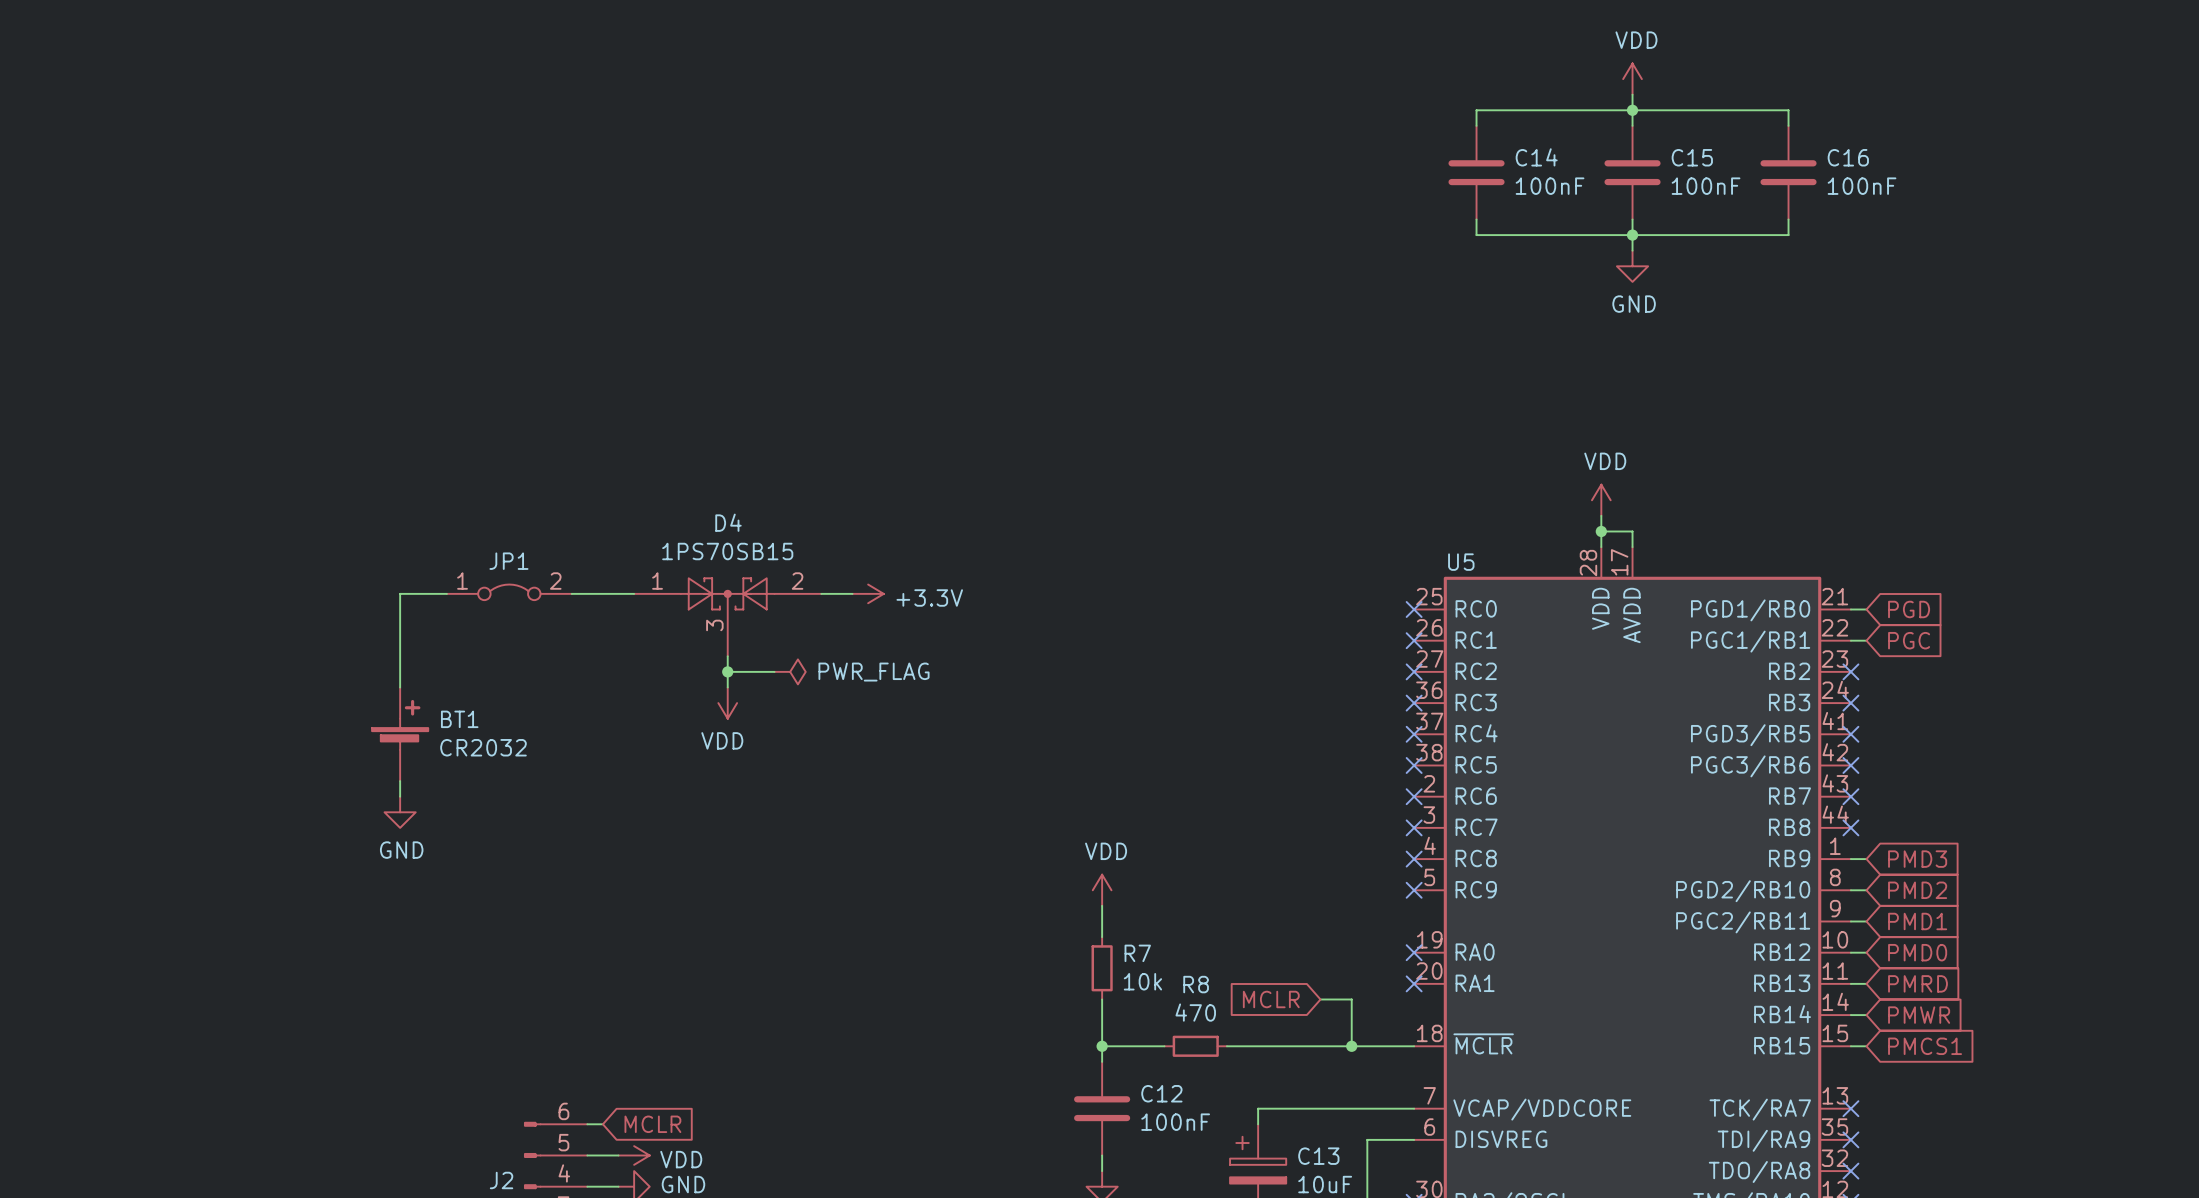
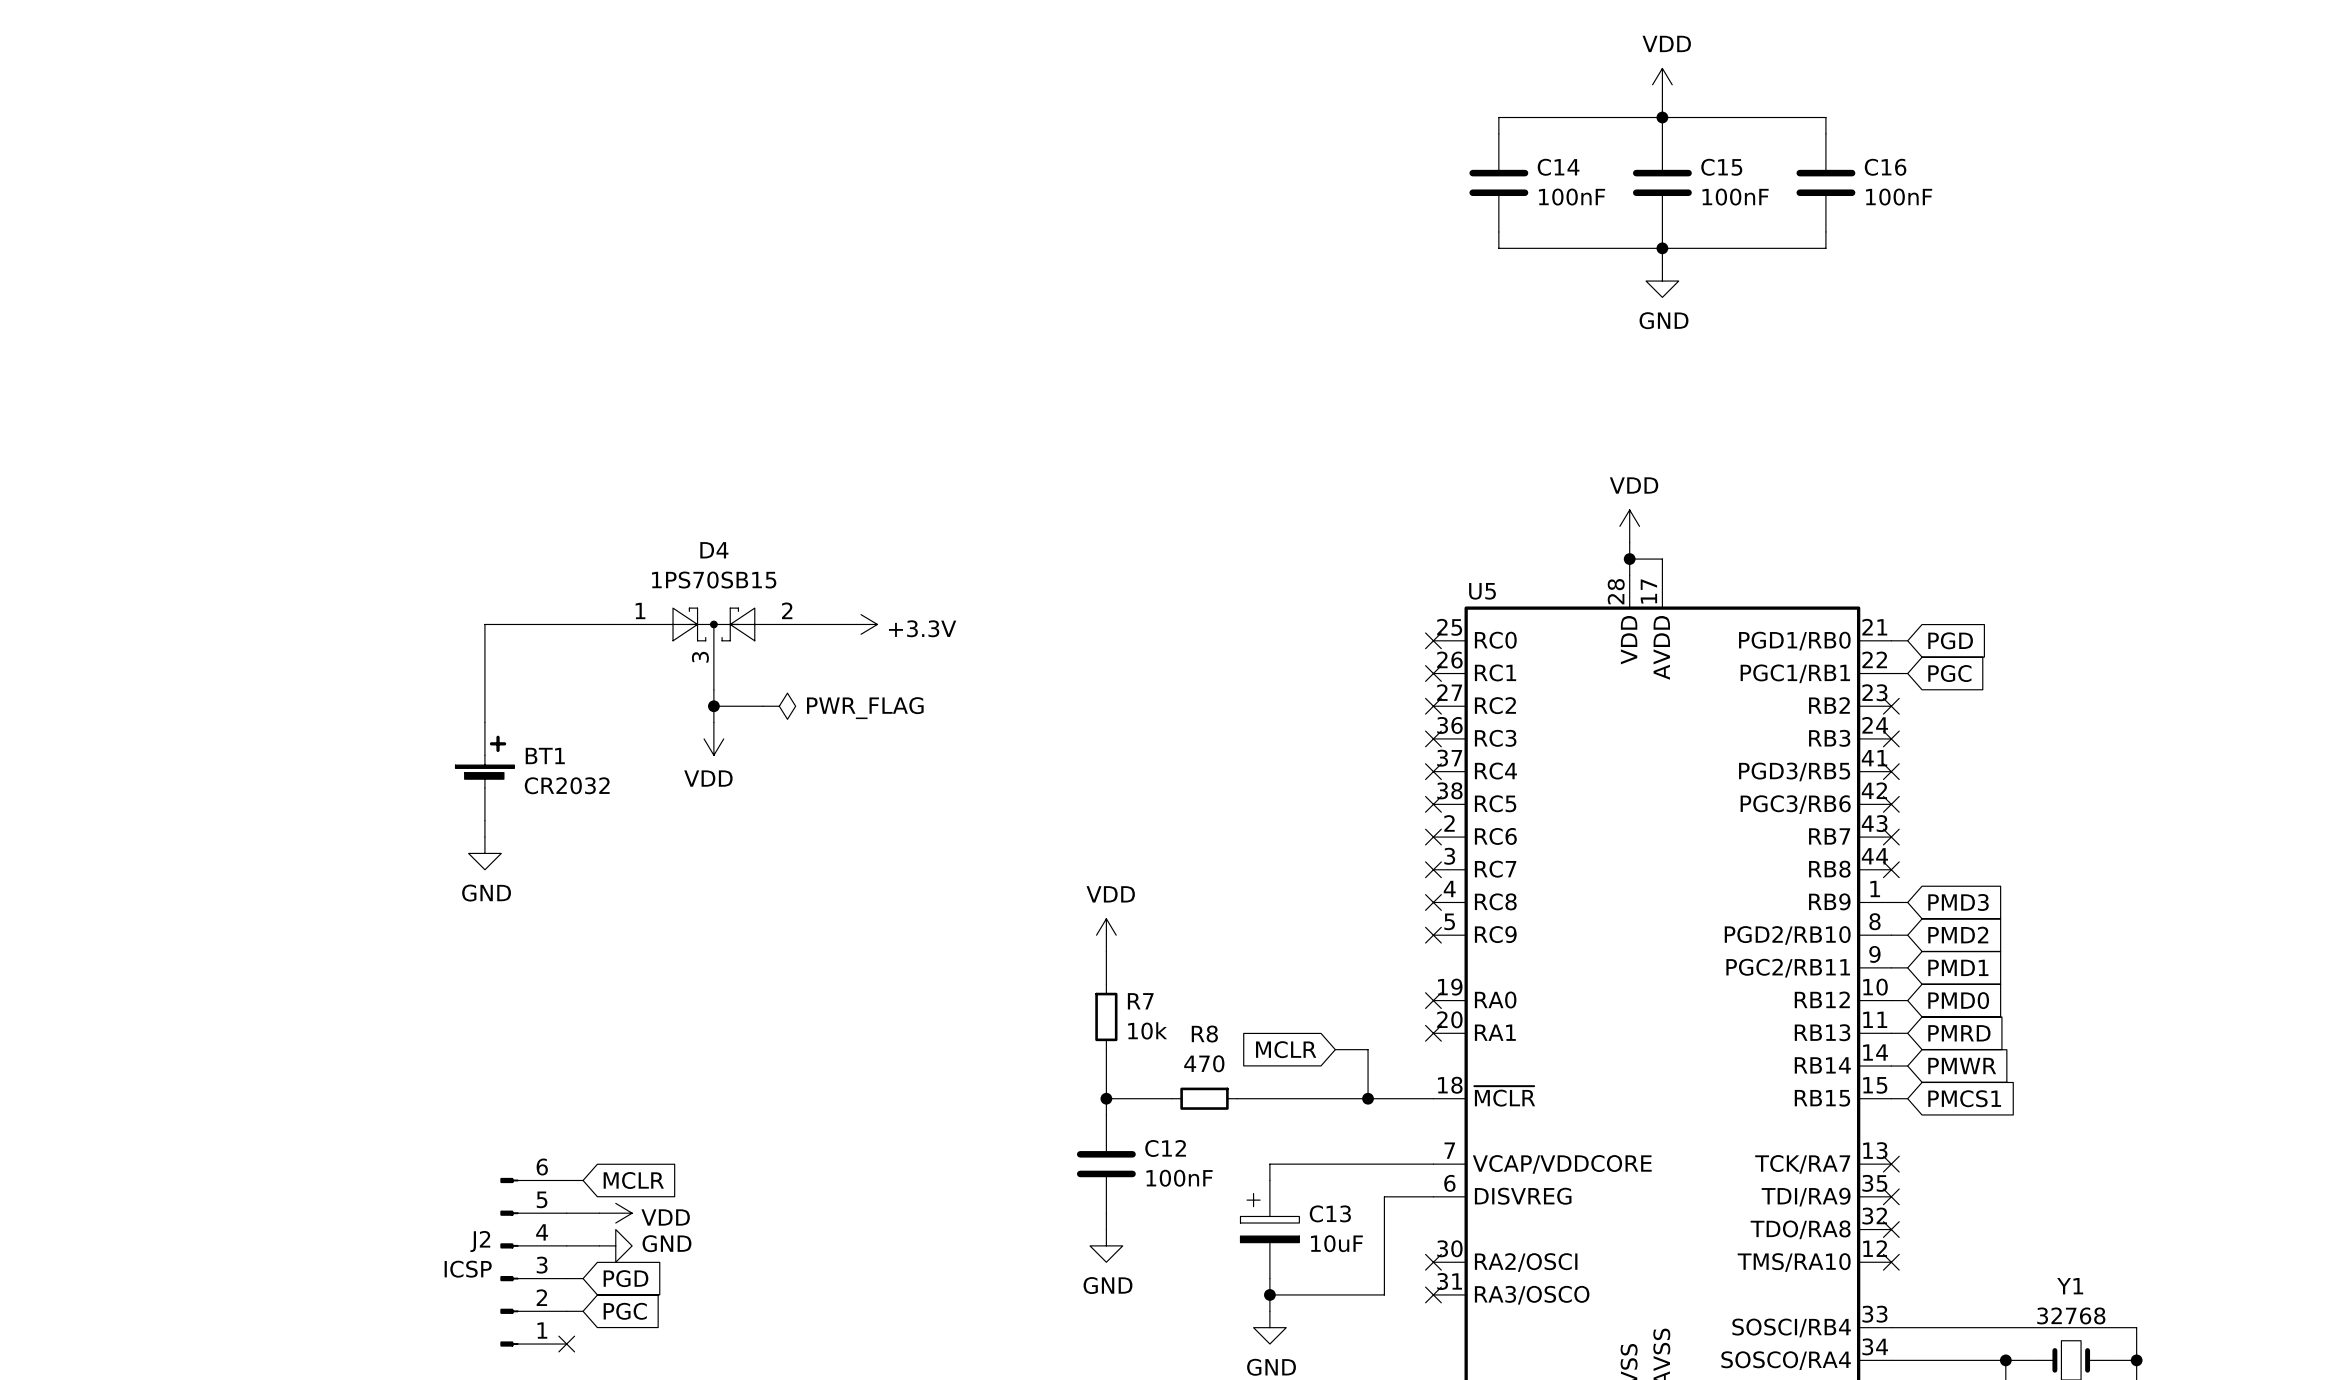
JP1: (509, 592) -> none
wire: (446, 593) (400, 593) (400, 687) -> none
wire: none -> (550, 624) (484, 624) (484, 722)
BT1 position: (400, 734) -> (484, 771)
wire: (400, 781) (400, 796) -> (484, 820) (484, 837)
power symbol position: GND (400, 812) -> GND (484, 853)

